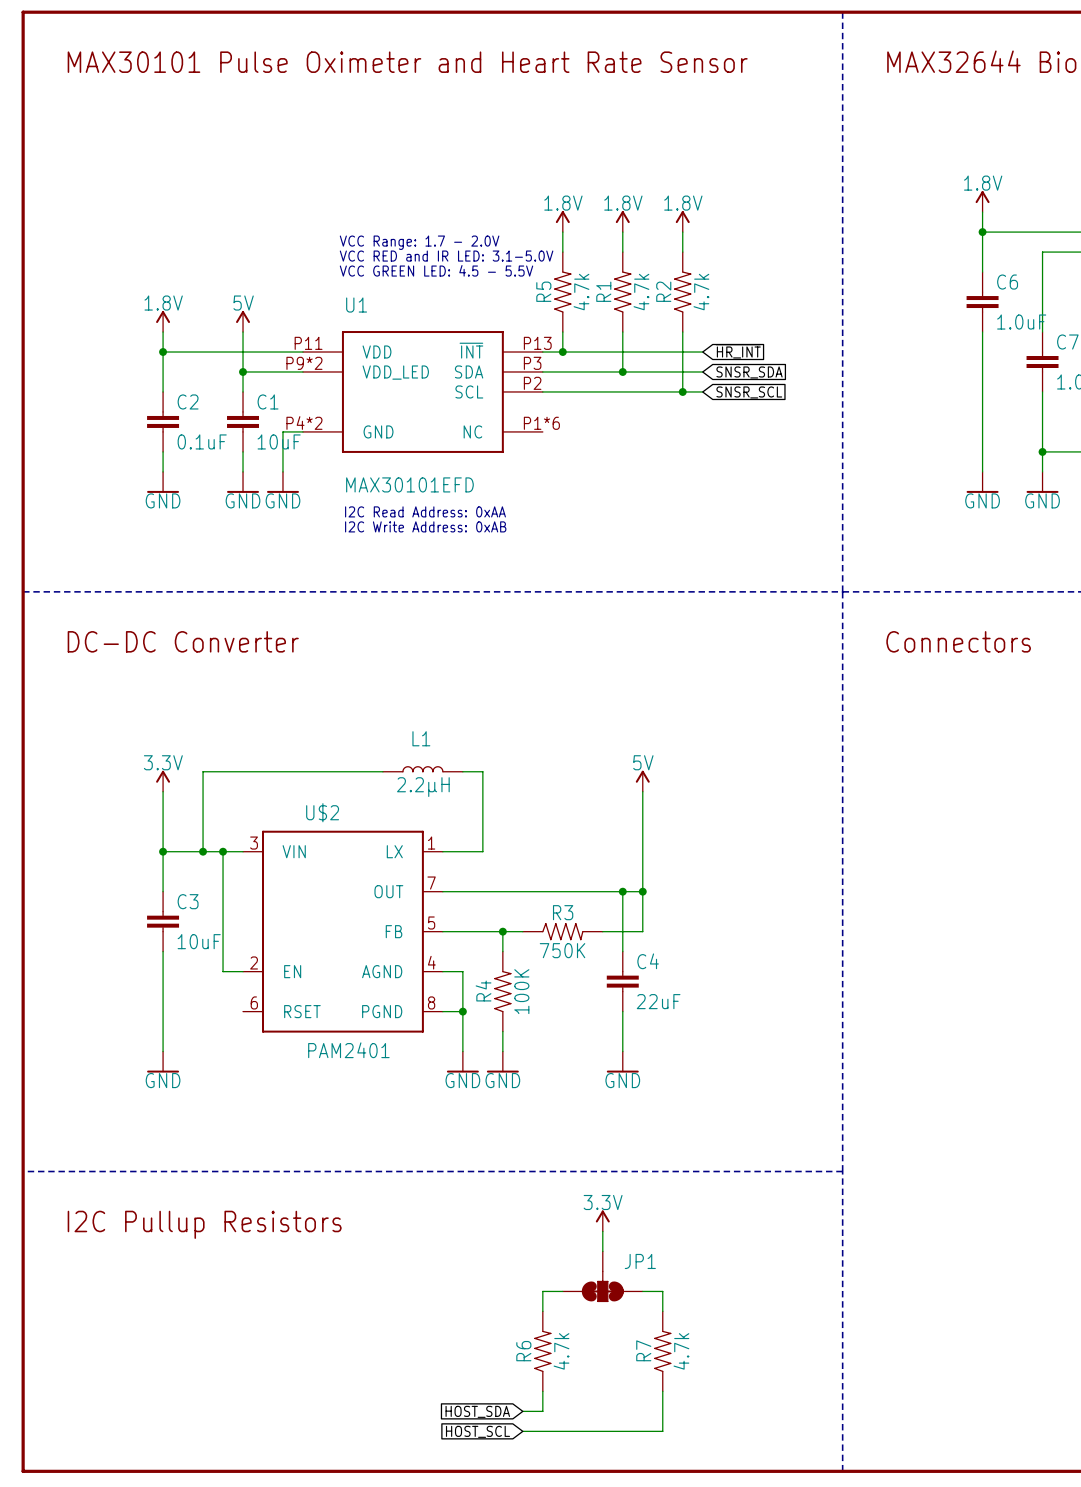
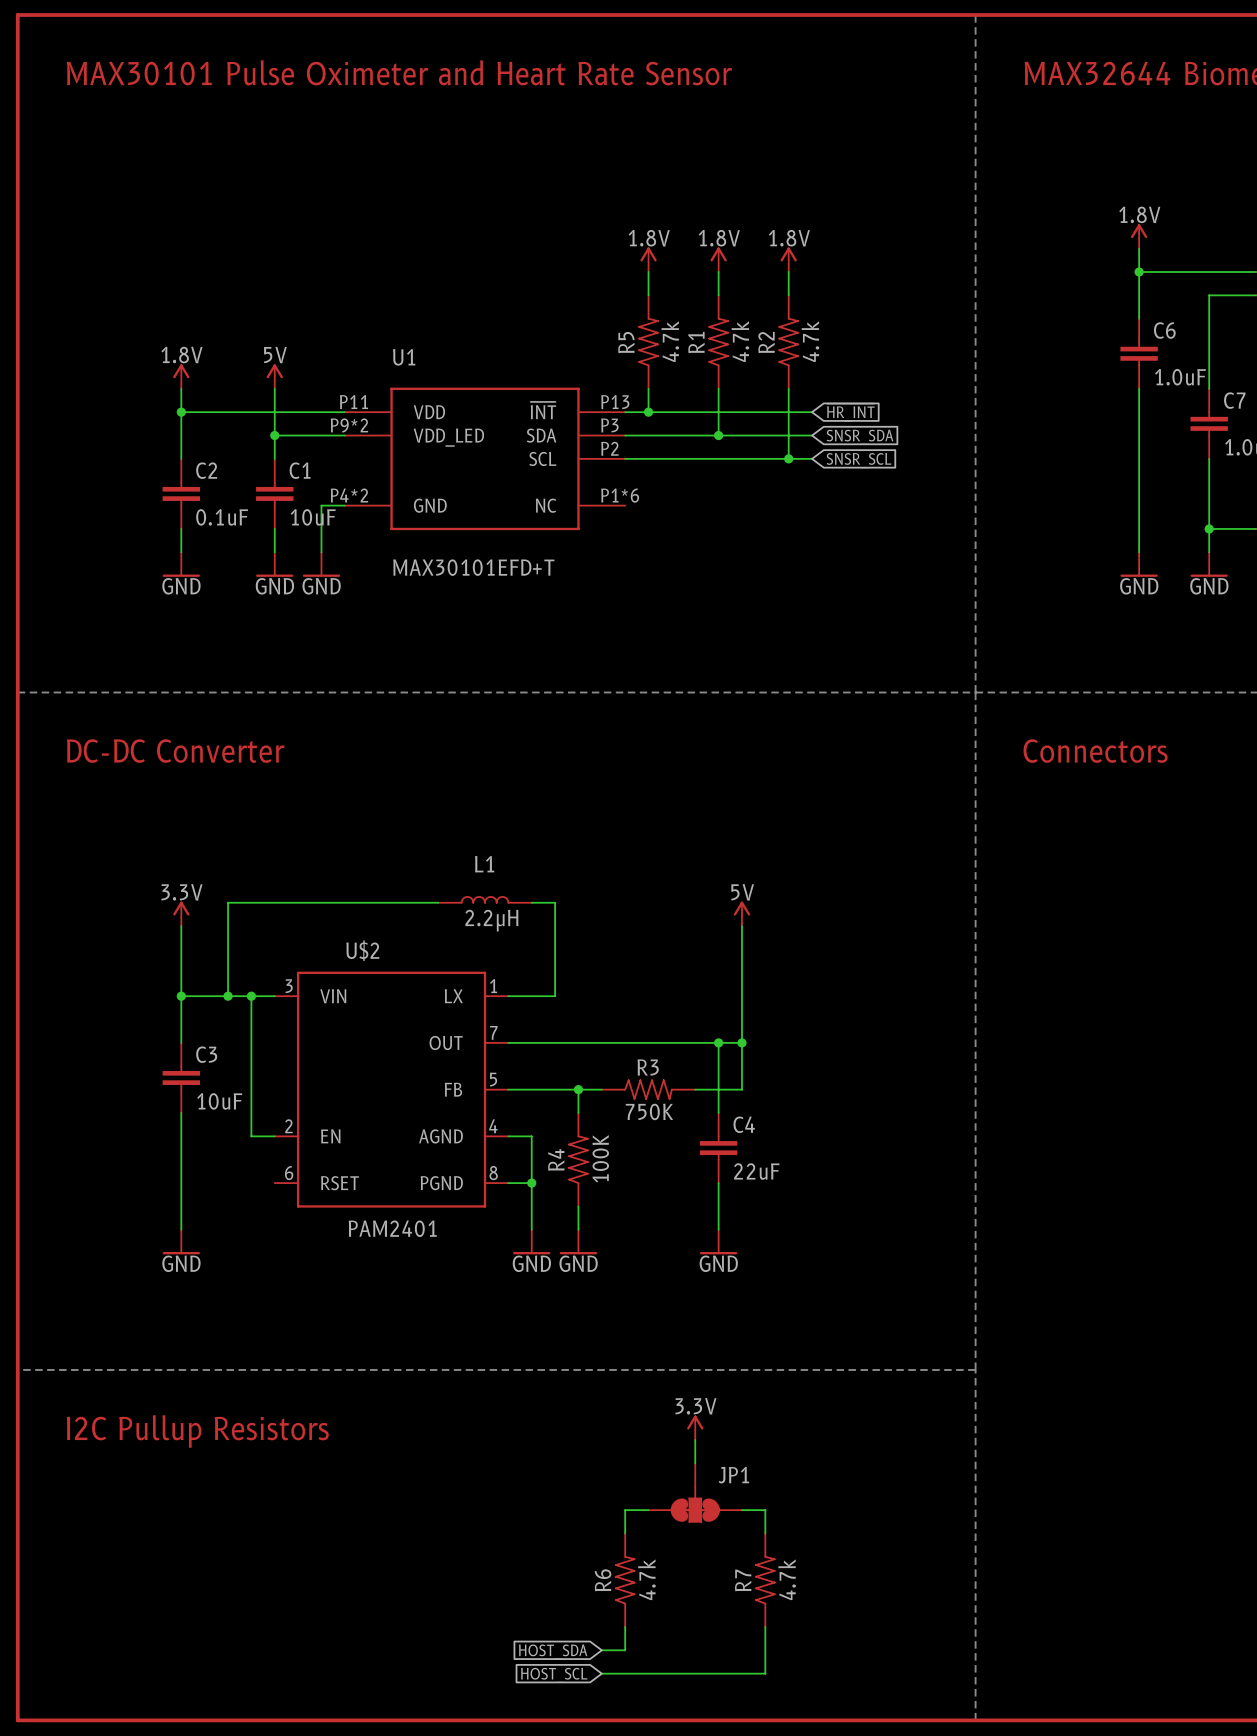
text: VCC Range: 1.7 - 2.0V (419, 242) -> none
text: VCC RED and IR LED: 3.1-5.0V (446, 256) -> none
text: VCC GREEN LED: 4.5 - 5.5V (436, 270) -> none
U1 value: MAX30101EFD (409, 484) -> MAX30101EFD+T (473, 567)
text: I2C Read Address: 0xAA (425, 511) -> none
text: I2C Write Address: 0xAB (425, 526) -> none

